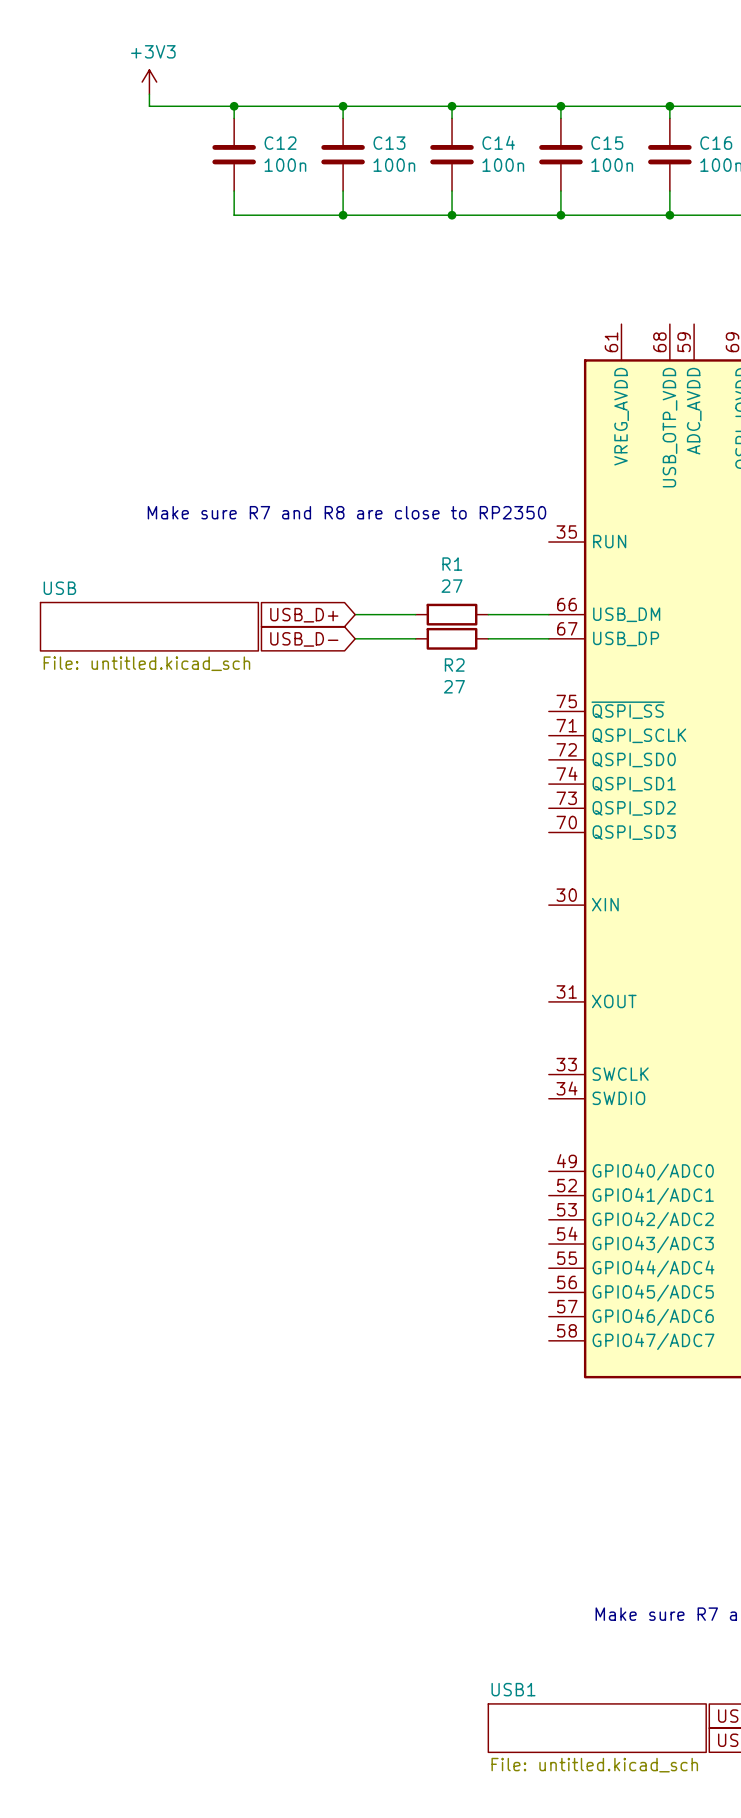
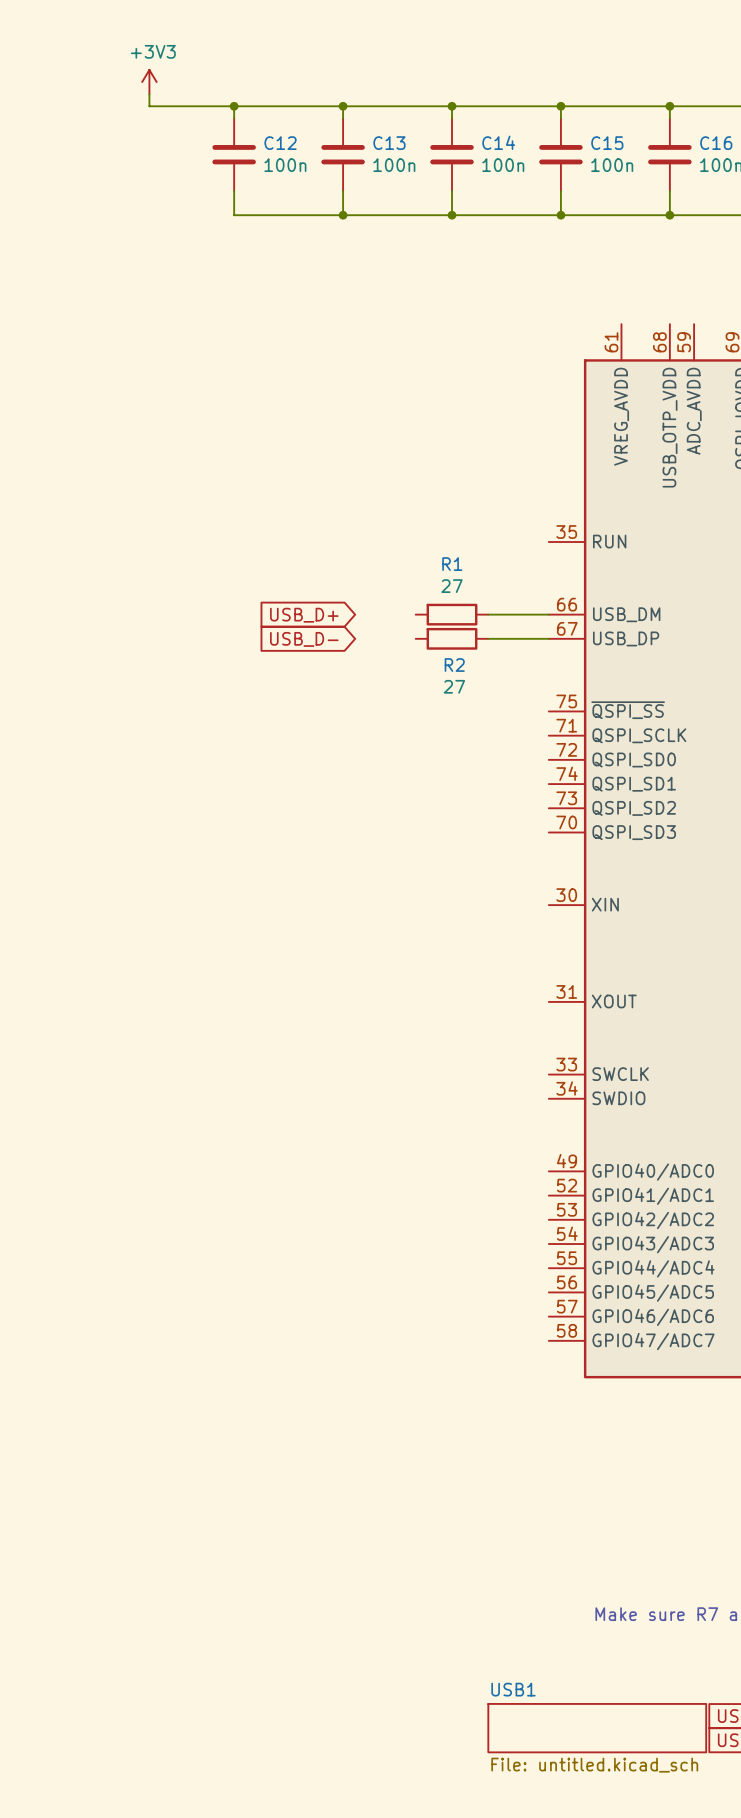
text: Make sure R7 and R8 are close to RP2350 (346, 512) -> none
wire: (355, 614) (415, 614) -> none
sheet USB: File: untitled.kicad_sch (149, 626) -> none
wire: (355, 638) (415, 638) -> none

